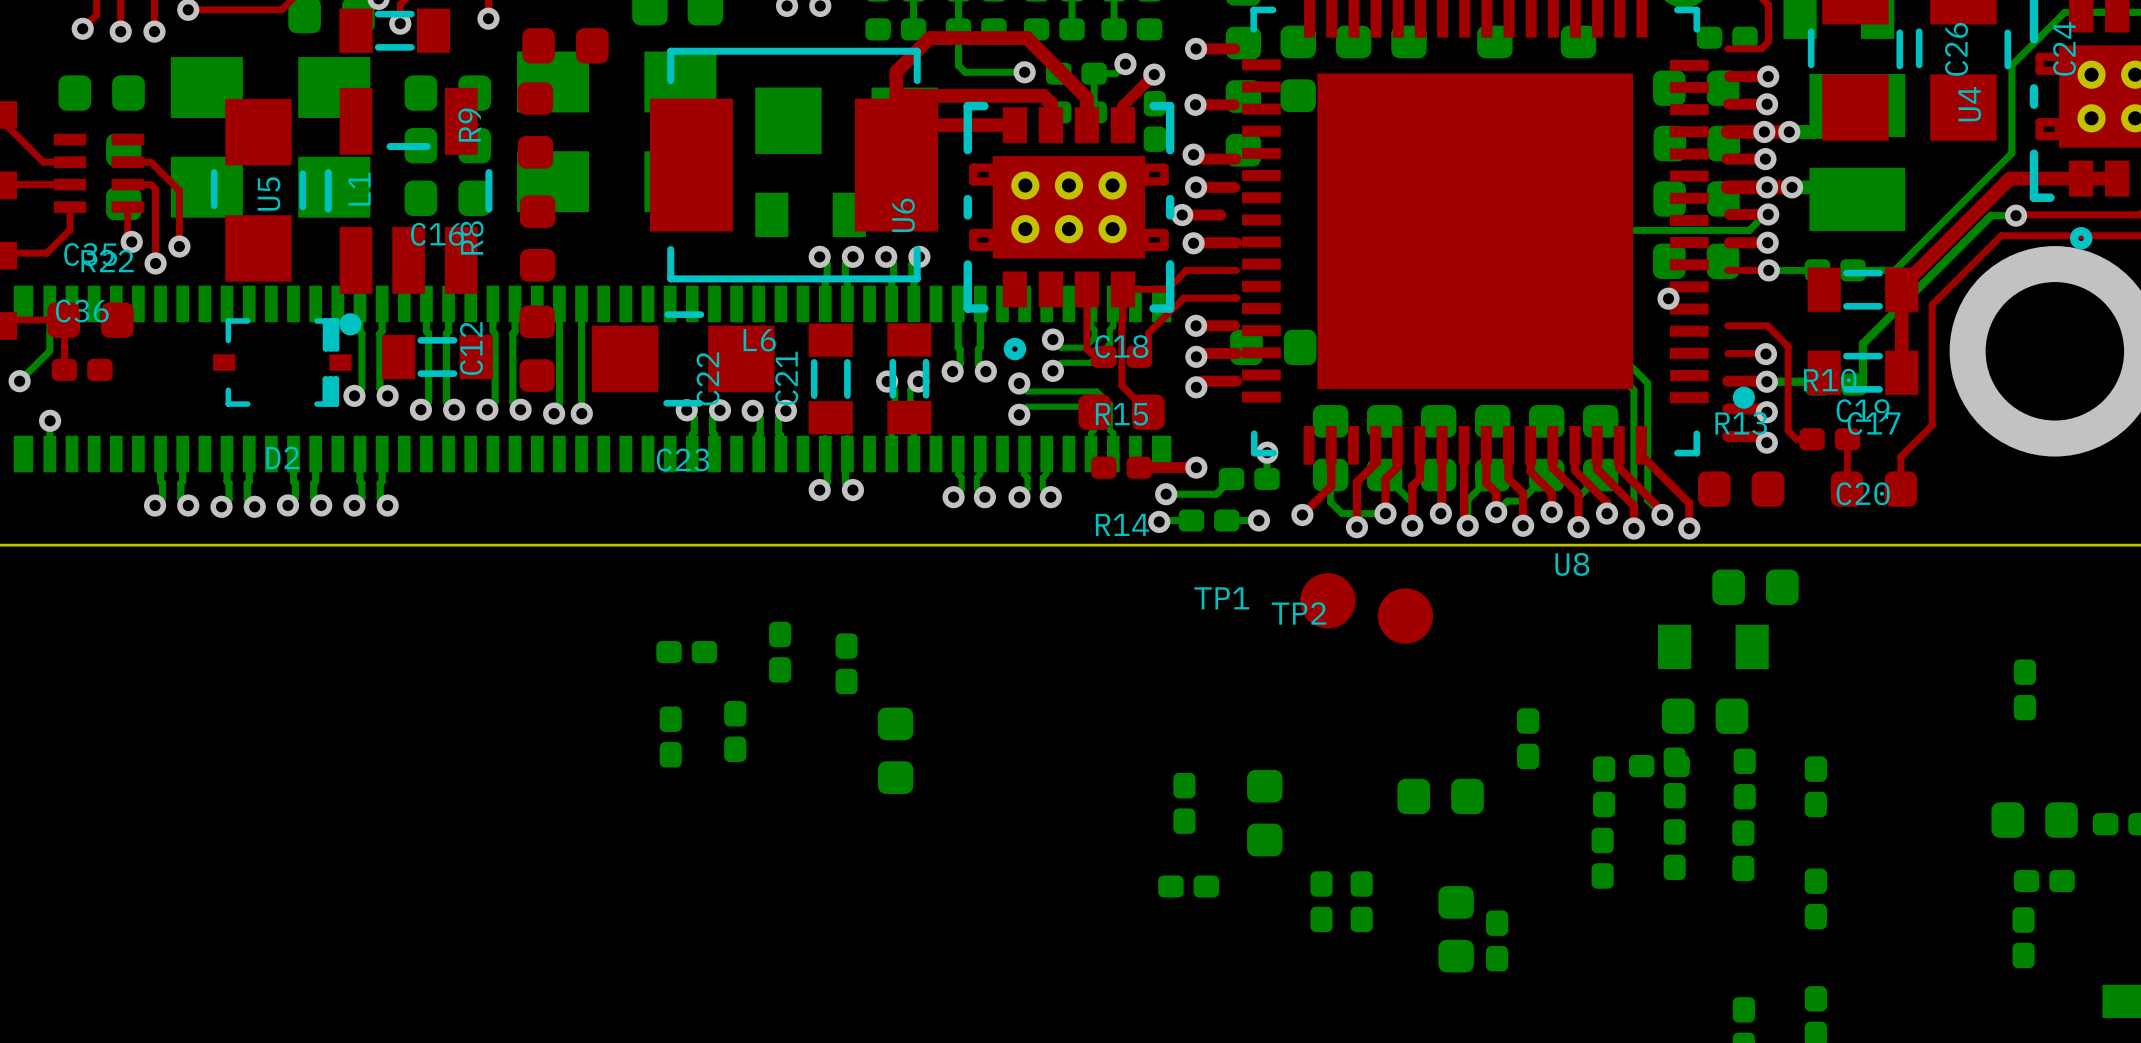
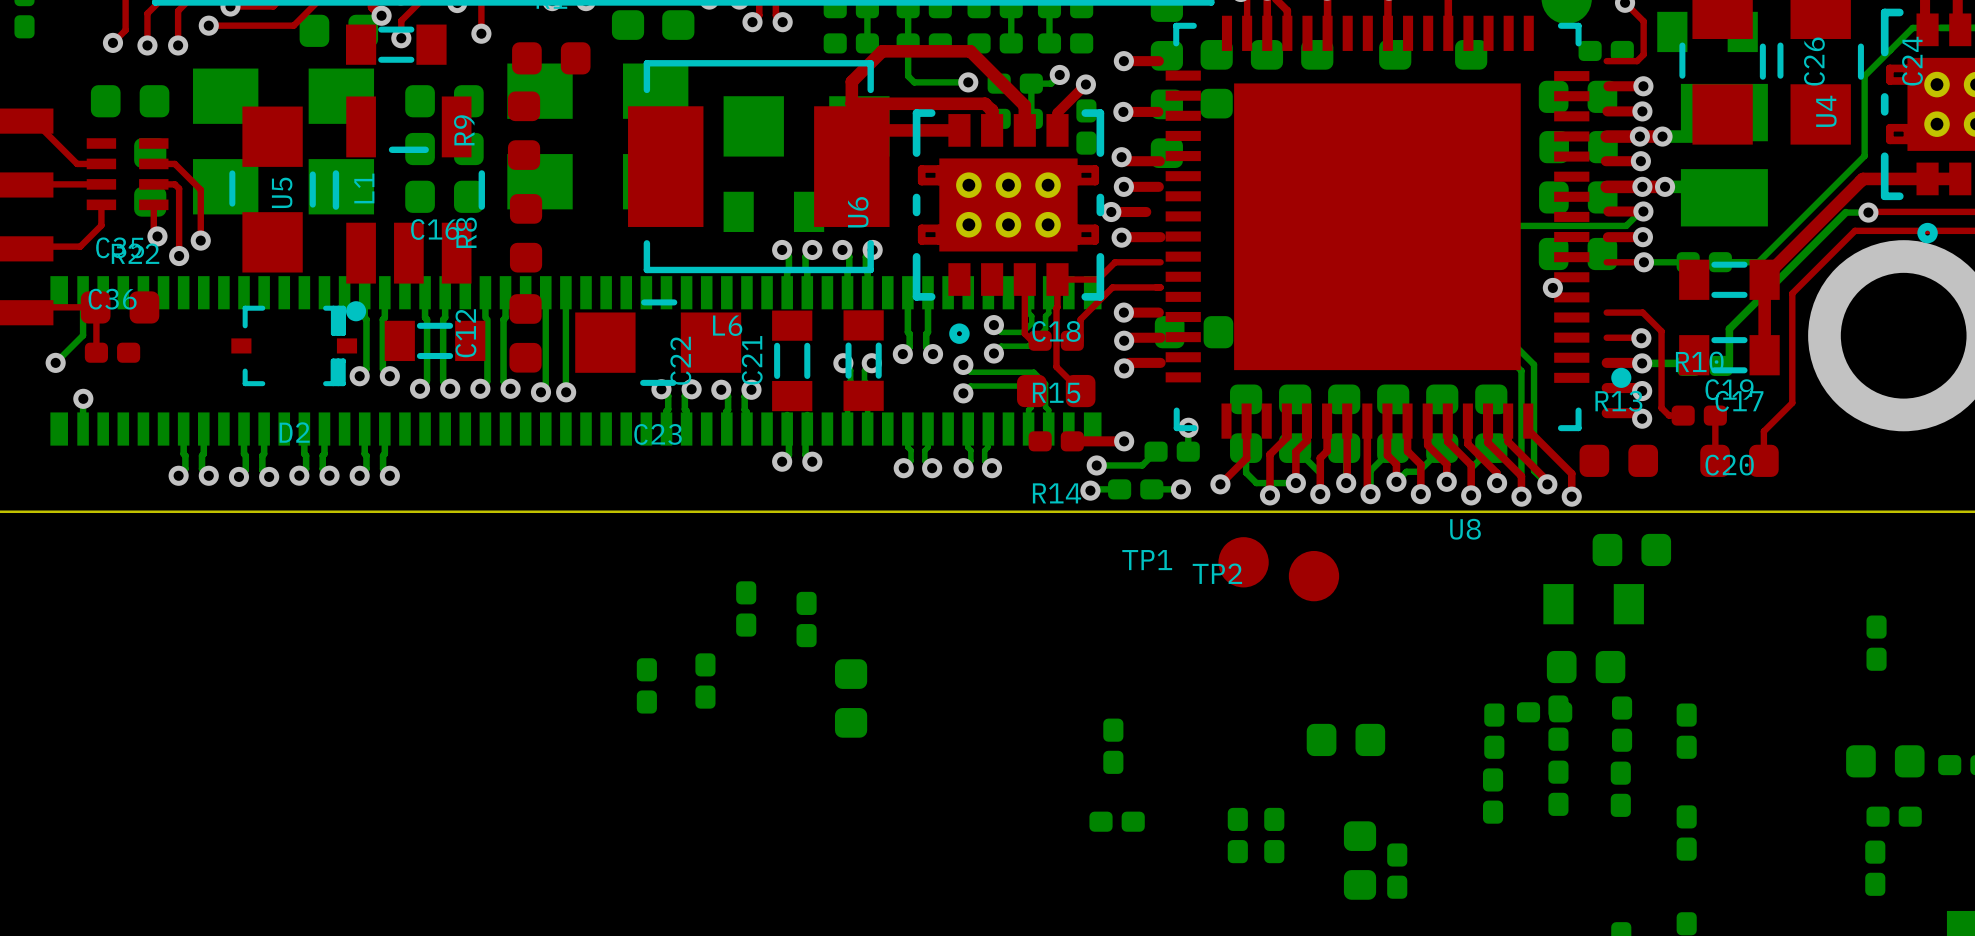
part: (686, 652) -> none
part: (1528, 738) -> none
part: (1264, 813) -> none

